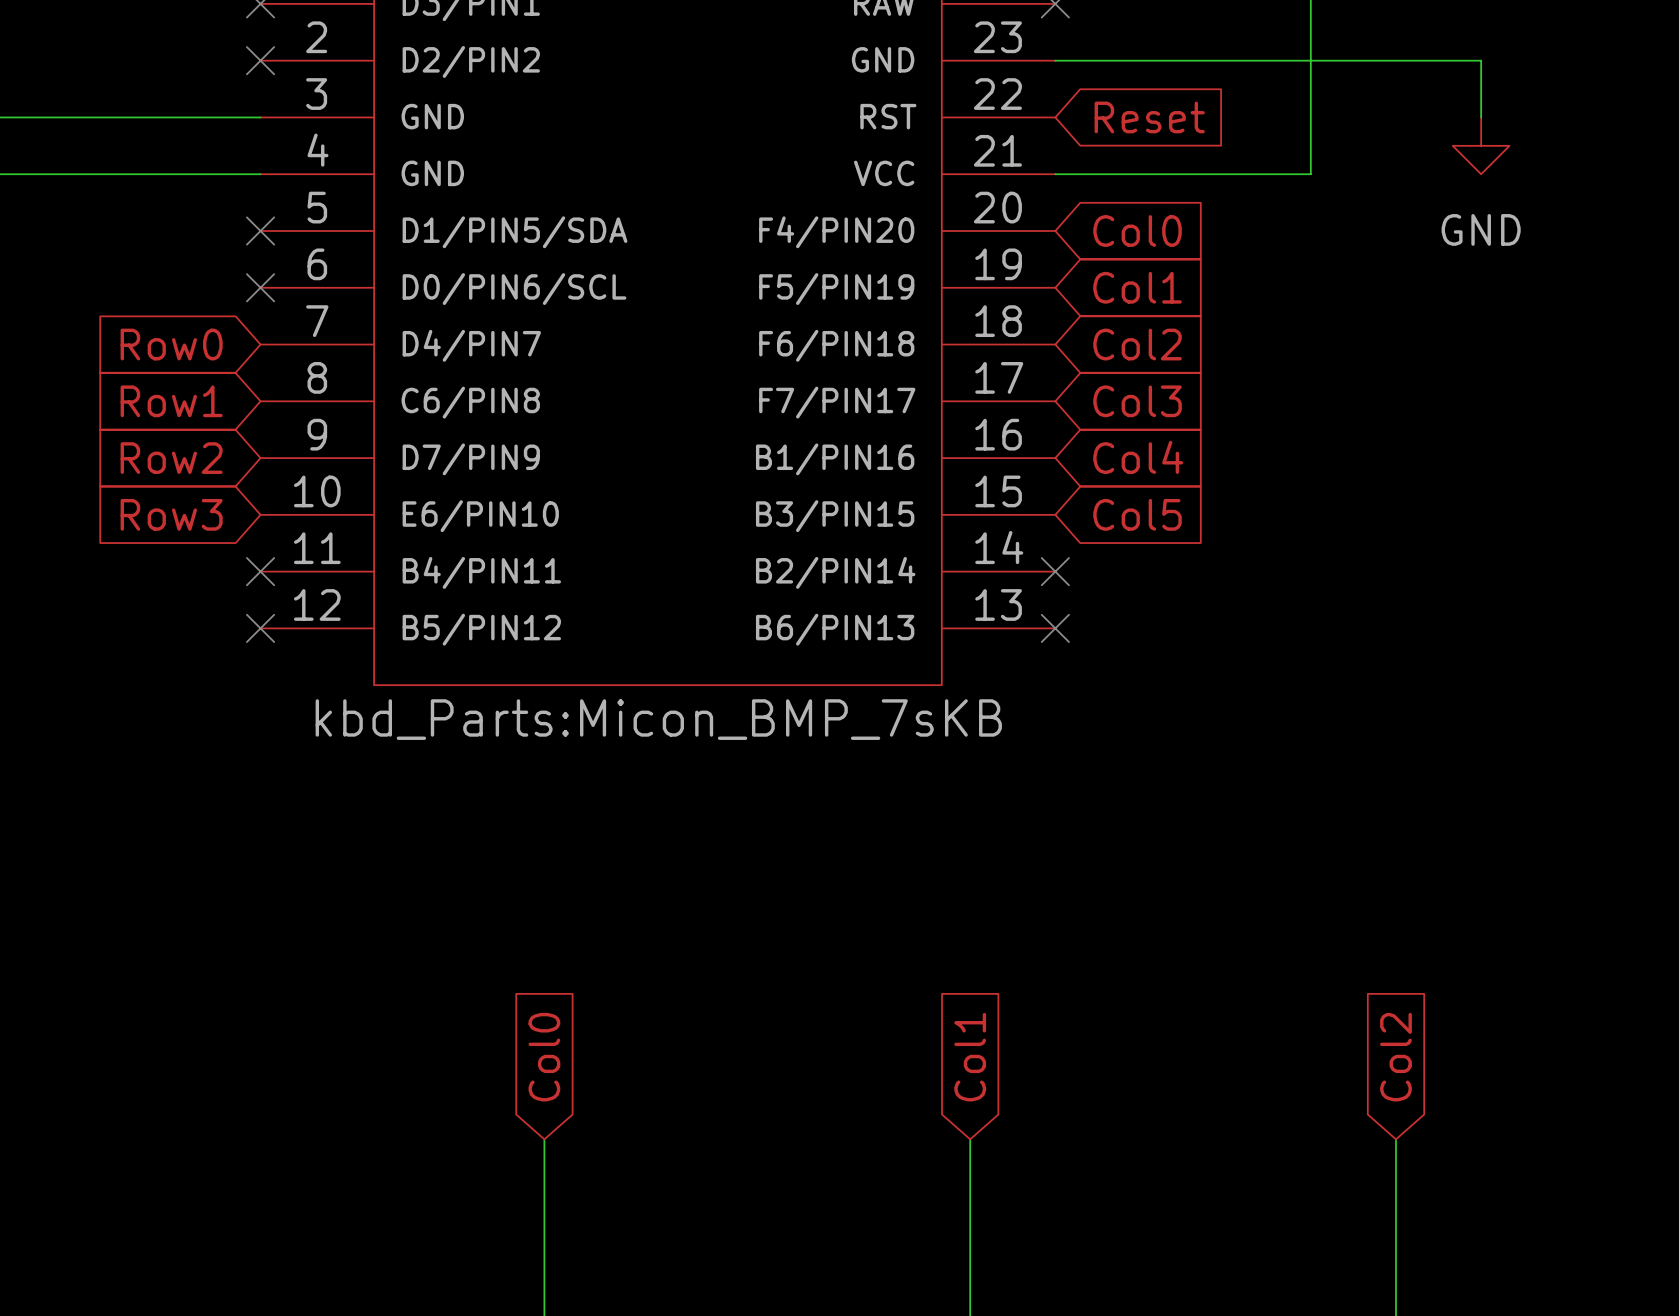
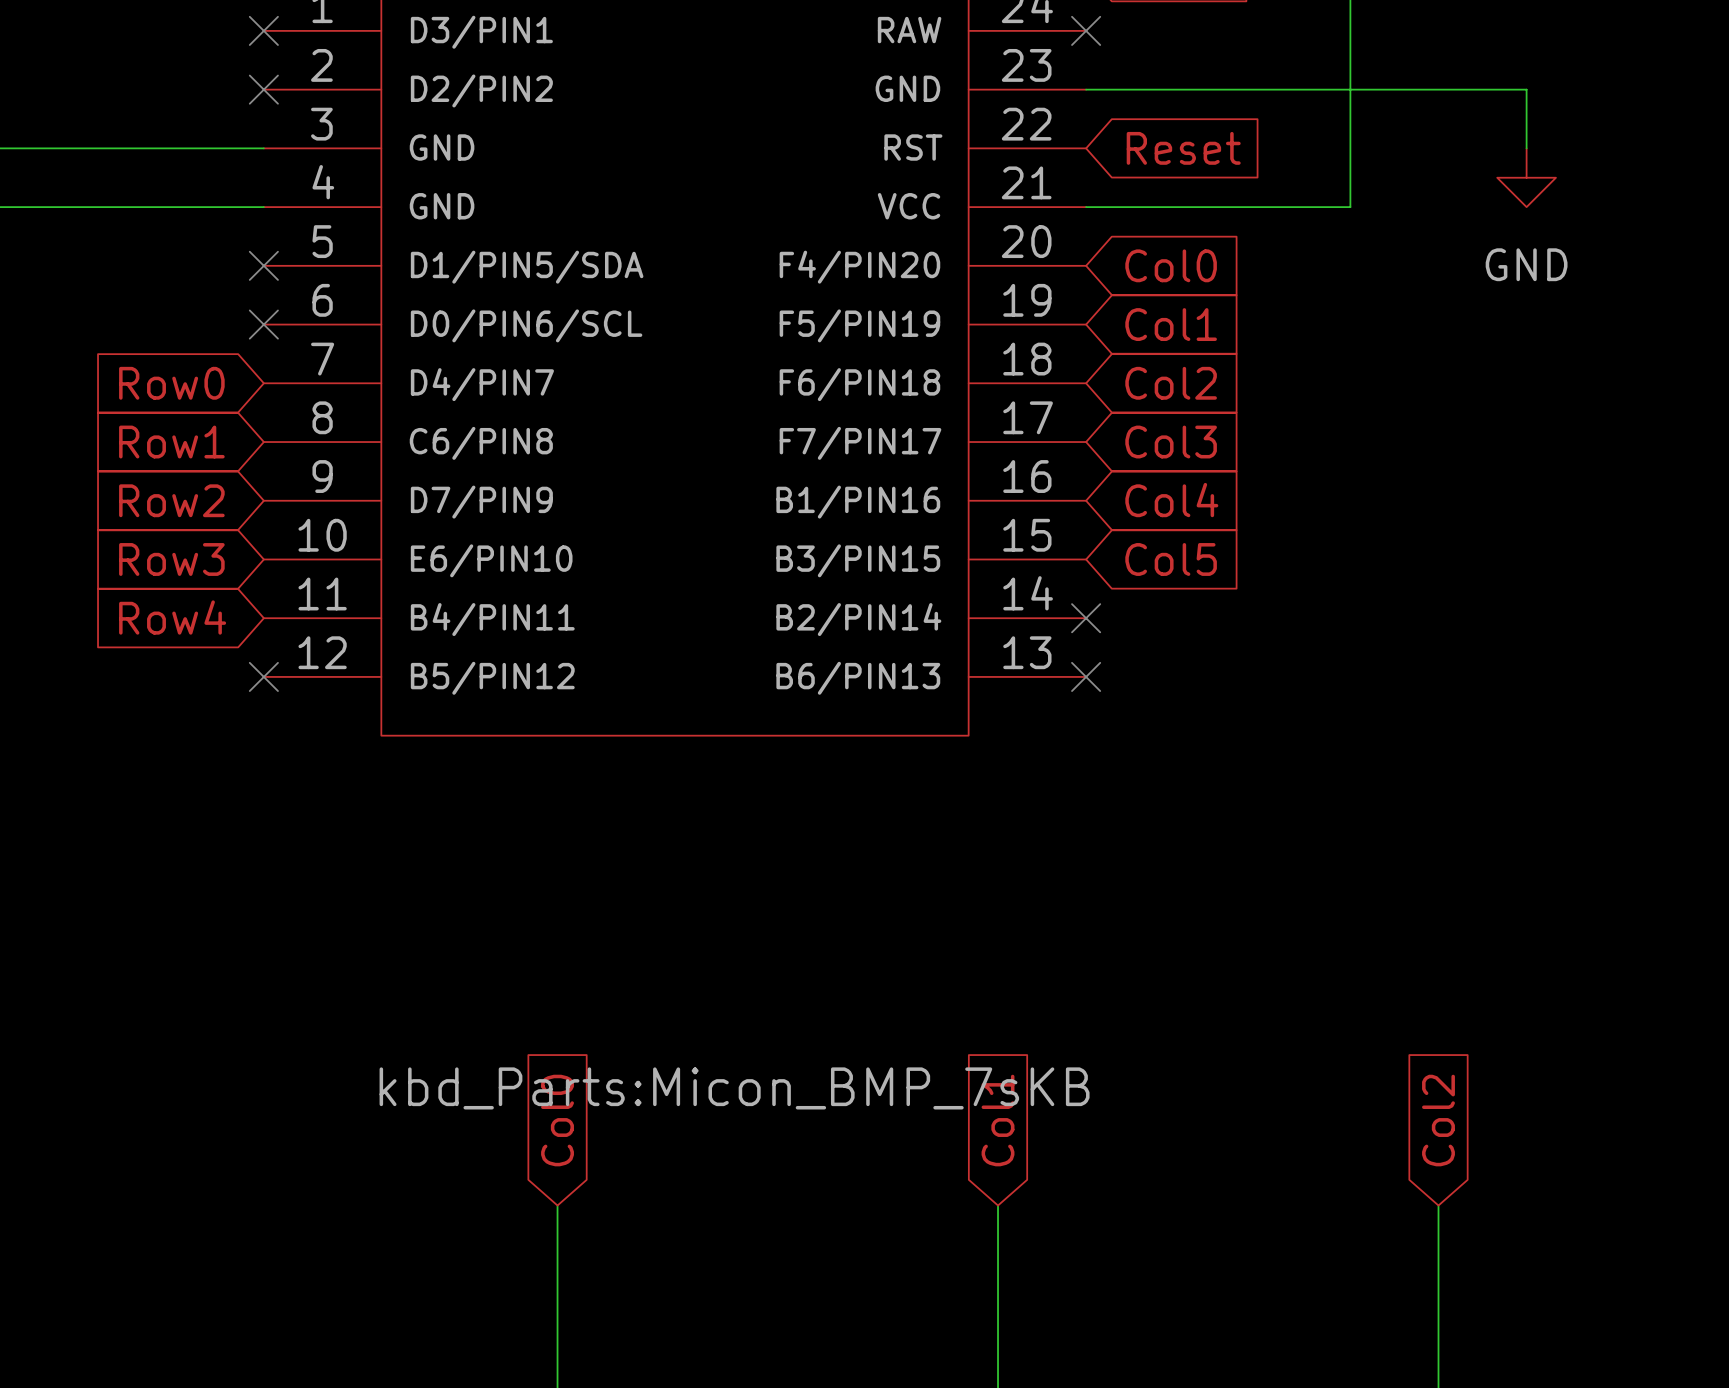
global label: none -> Row4 (172, 617)
no-connect mark: (260, 571) -> none
part text position: kbd_Parts:Micon_BMP_7sKB (658, 719) -> kbd_Parts:Micon_BMP_7sKB (734, 1088)

